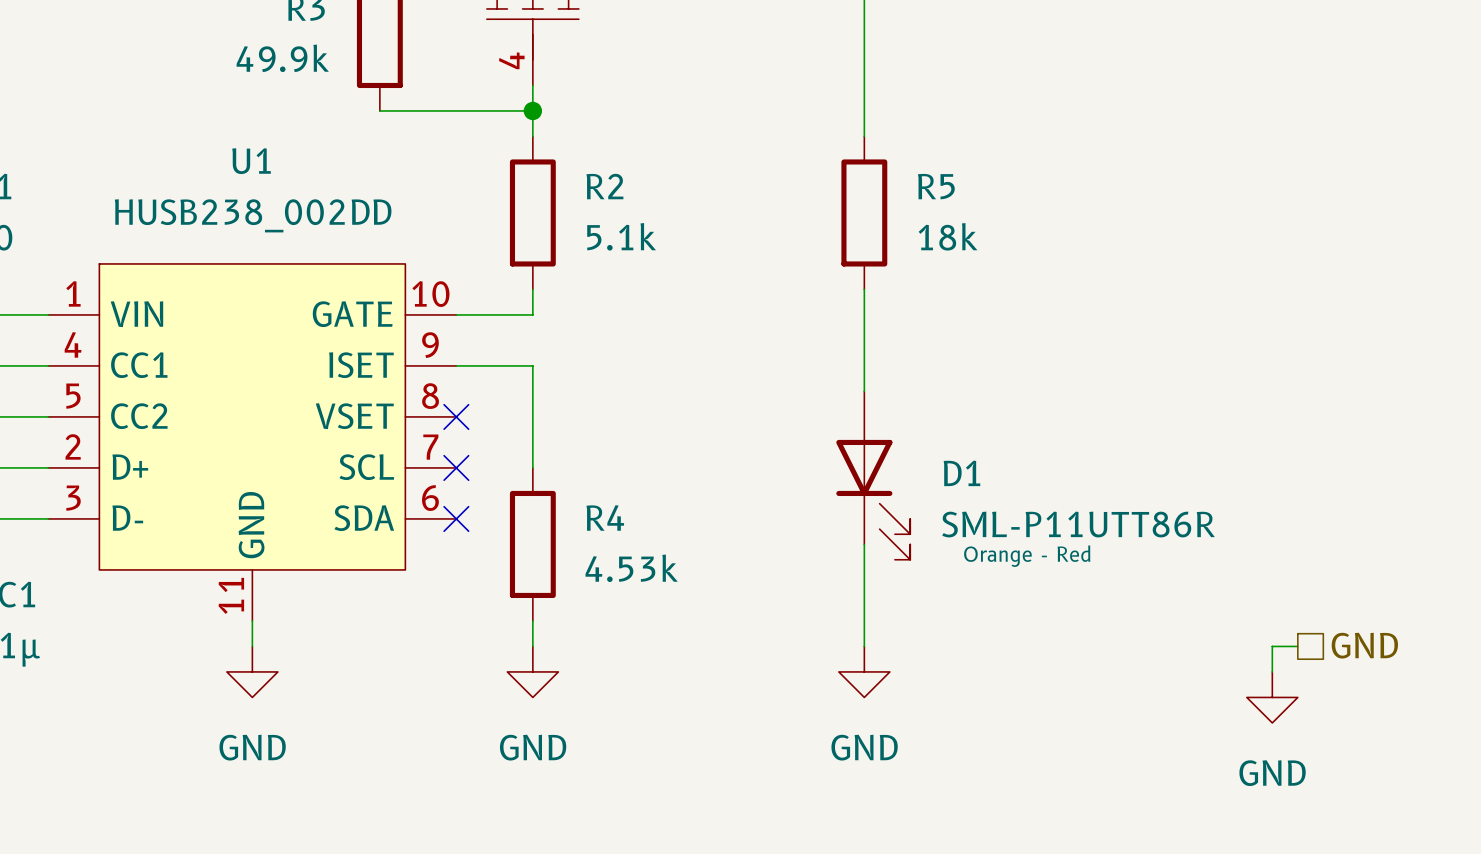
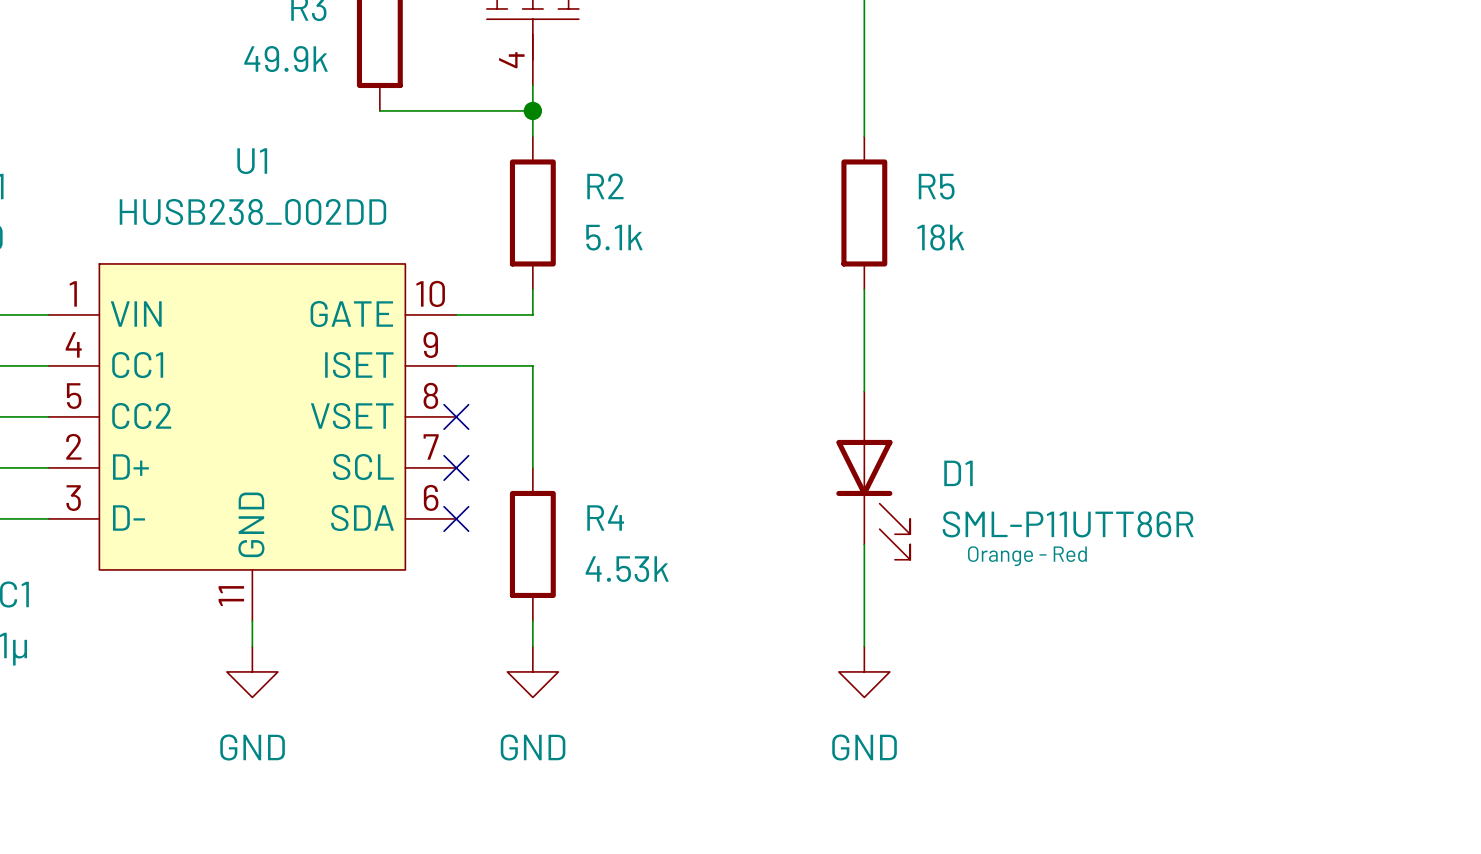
hierarchical label: GND (1364, 645) -> none
wire: (1297, 646) (1272, 646) (1272, 671) -> none
power symbol: GND (1272, 697) -> none

